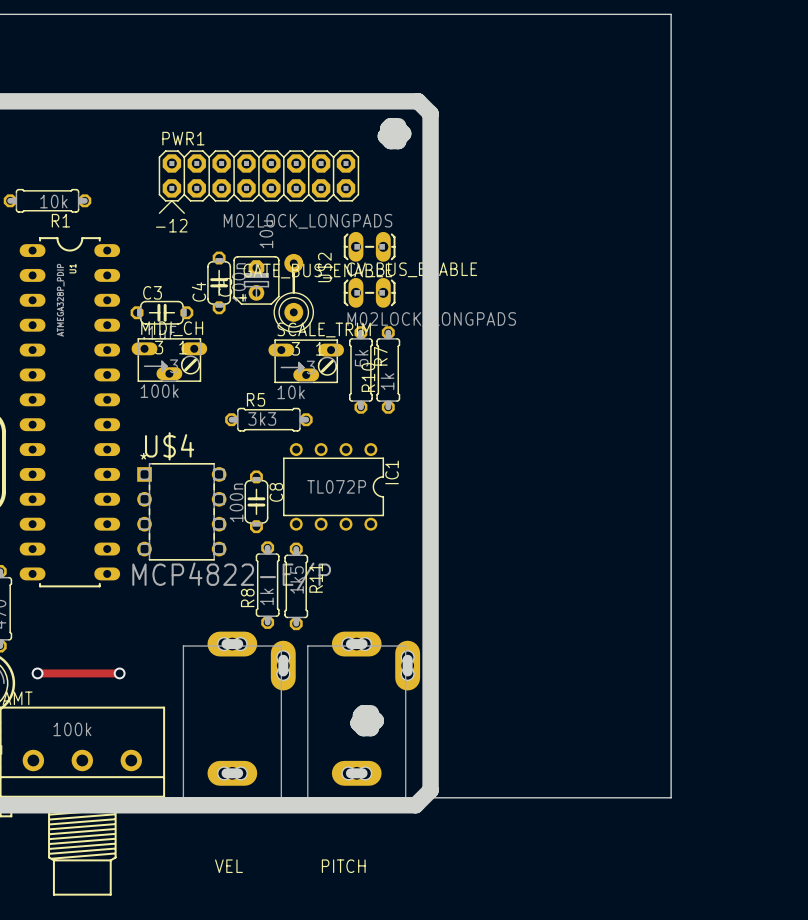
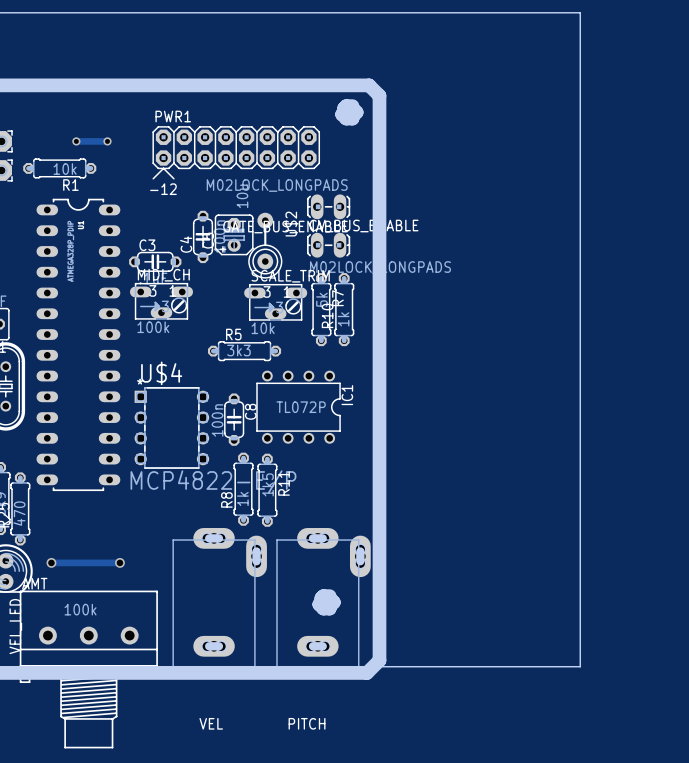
track: none -> (76, 141) (107, 141)
via: none -> (76, 141)
via: none -> (107, 141)

